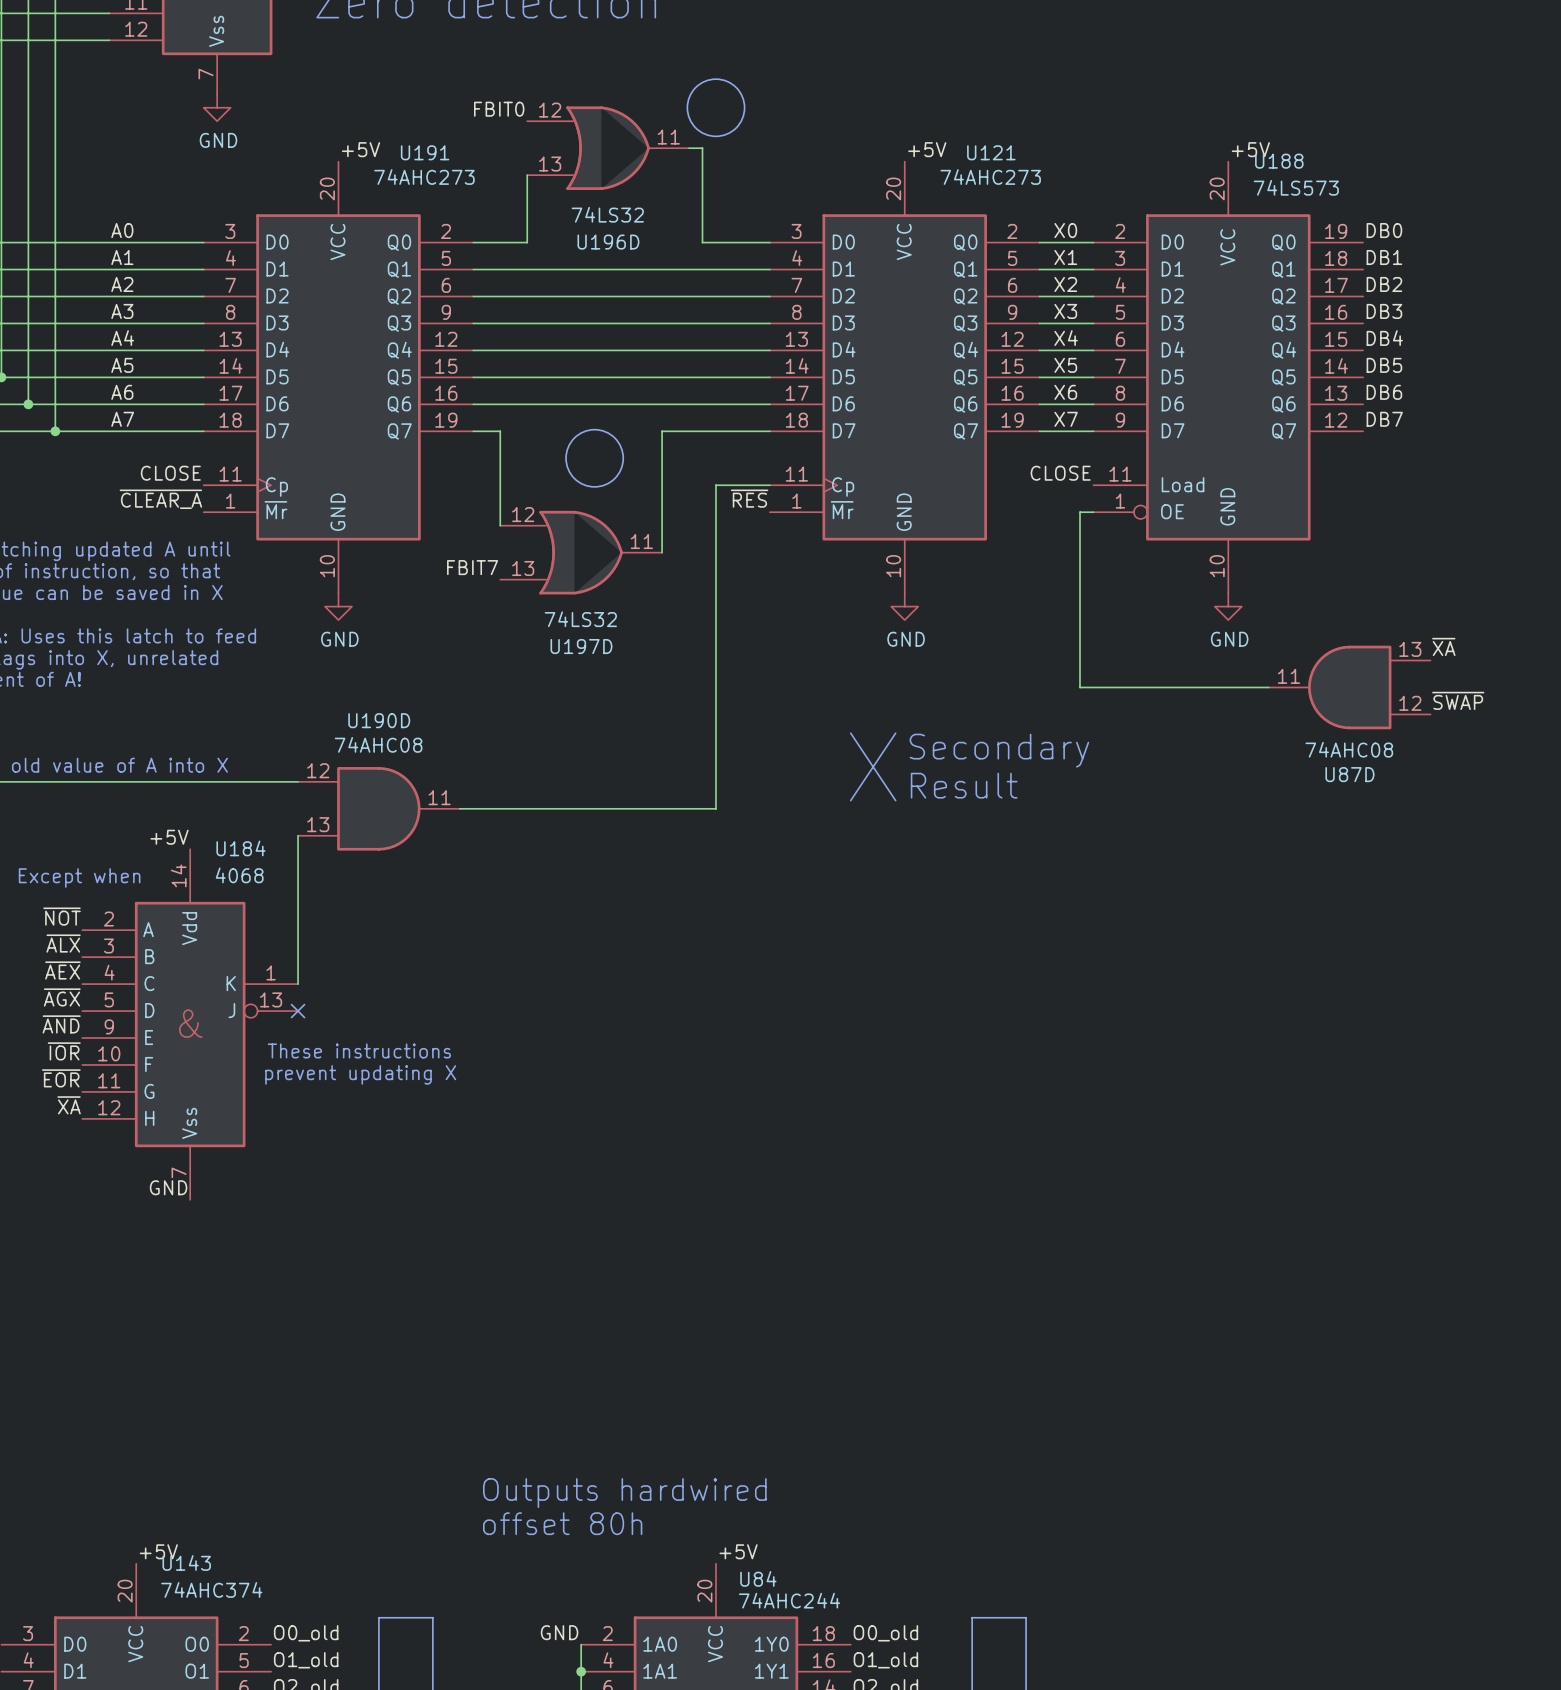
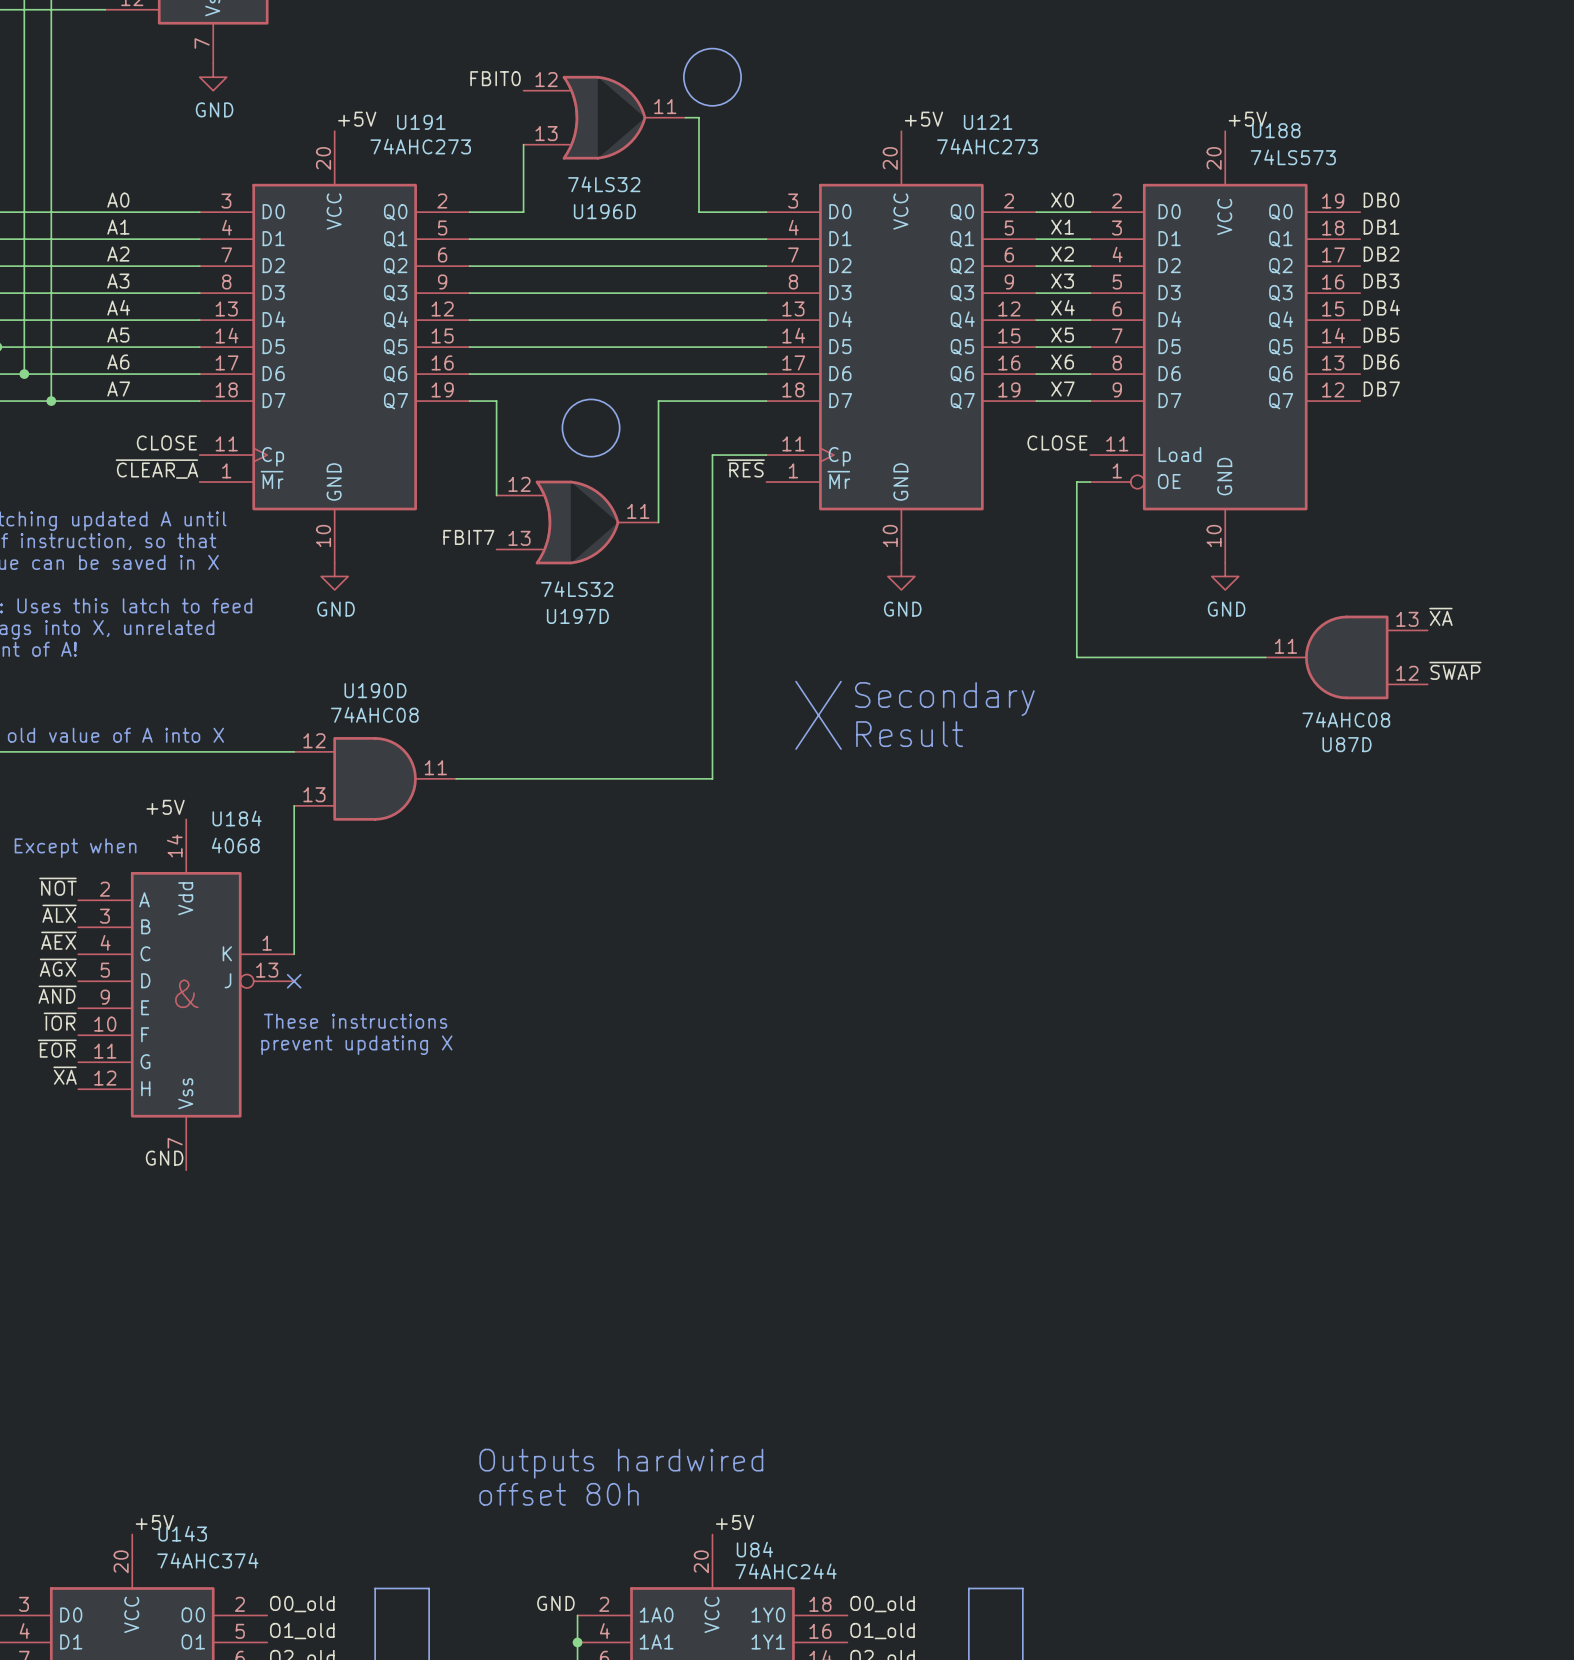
text position: Secondary (999, 750) -> Secondary (944, 699)
text position: X (873, 766) -> X (818, 715)
text position: Result (964, 785) -> Result (909, 734)

